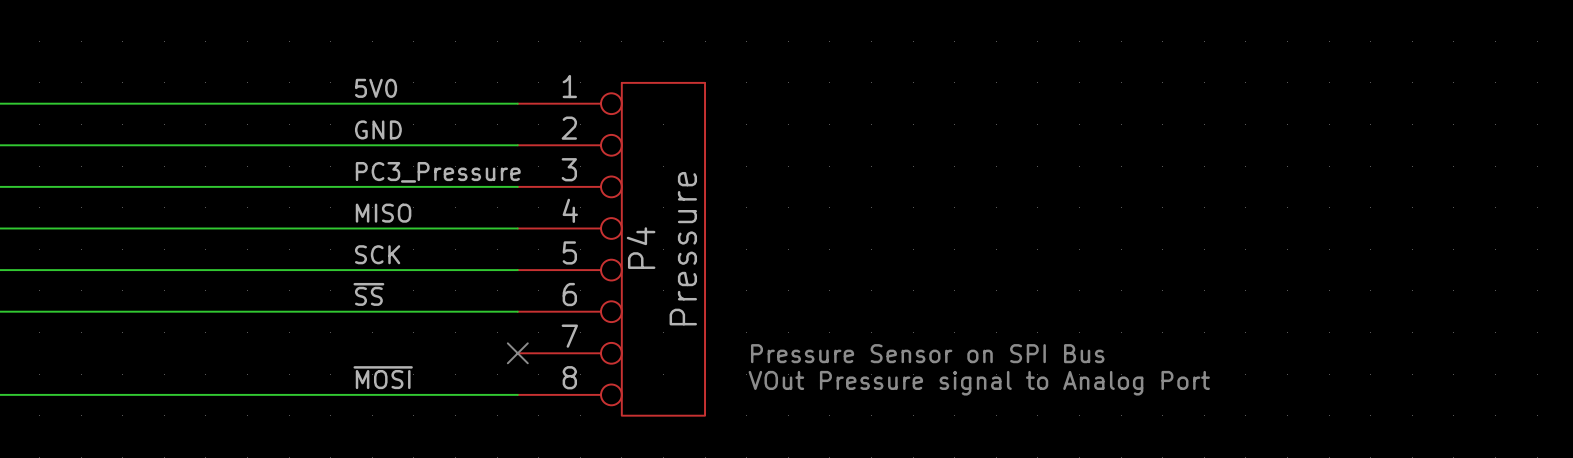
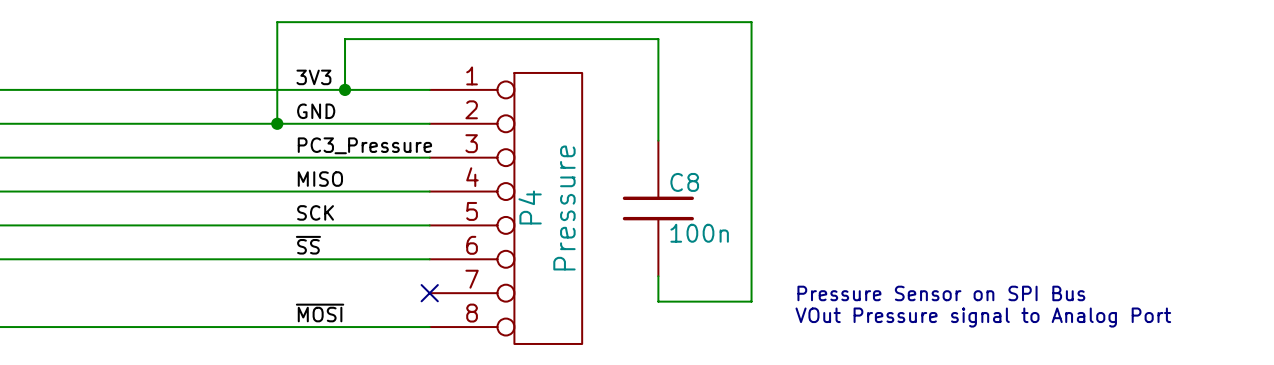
label: 5V0 (376, 88) -> 3V3 (313, 77)
wire: none -> (345, 89) (345, 39) (658, 39) (658, 140)
junction: none -> (345, 89)
wire: none -> (277, 123) (277, 22) (751, 22) (751, 301) (658, 301) (658, 276)
junction: none -> (277, 123)
C8: none -> 100n (658, 208)
text position: Pressure Sensor on SPI Bus (927, 353) -> Pressure Sensor on SPI Bus (941, 293)
text position: VOut Pressure signal to Analog Port (979, 383) -> VOut Pressure signal to Analog Port (983, 317)

